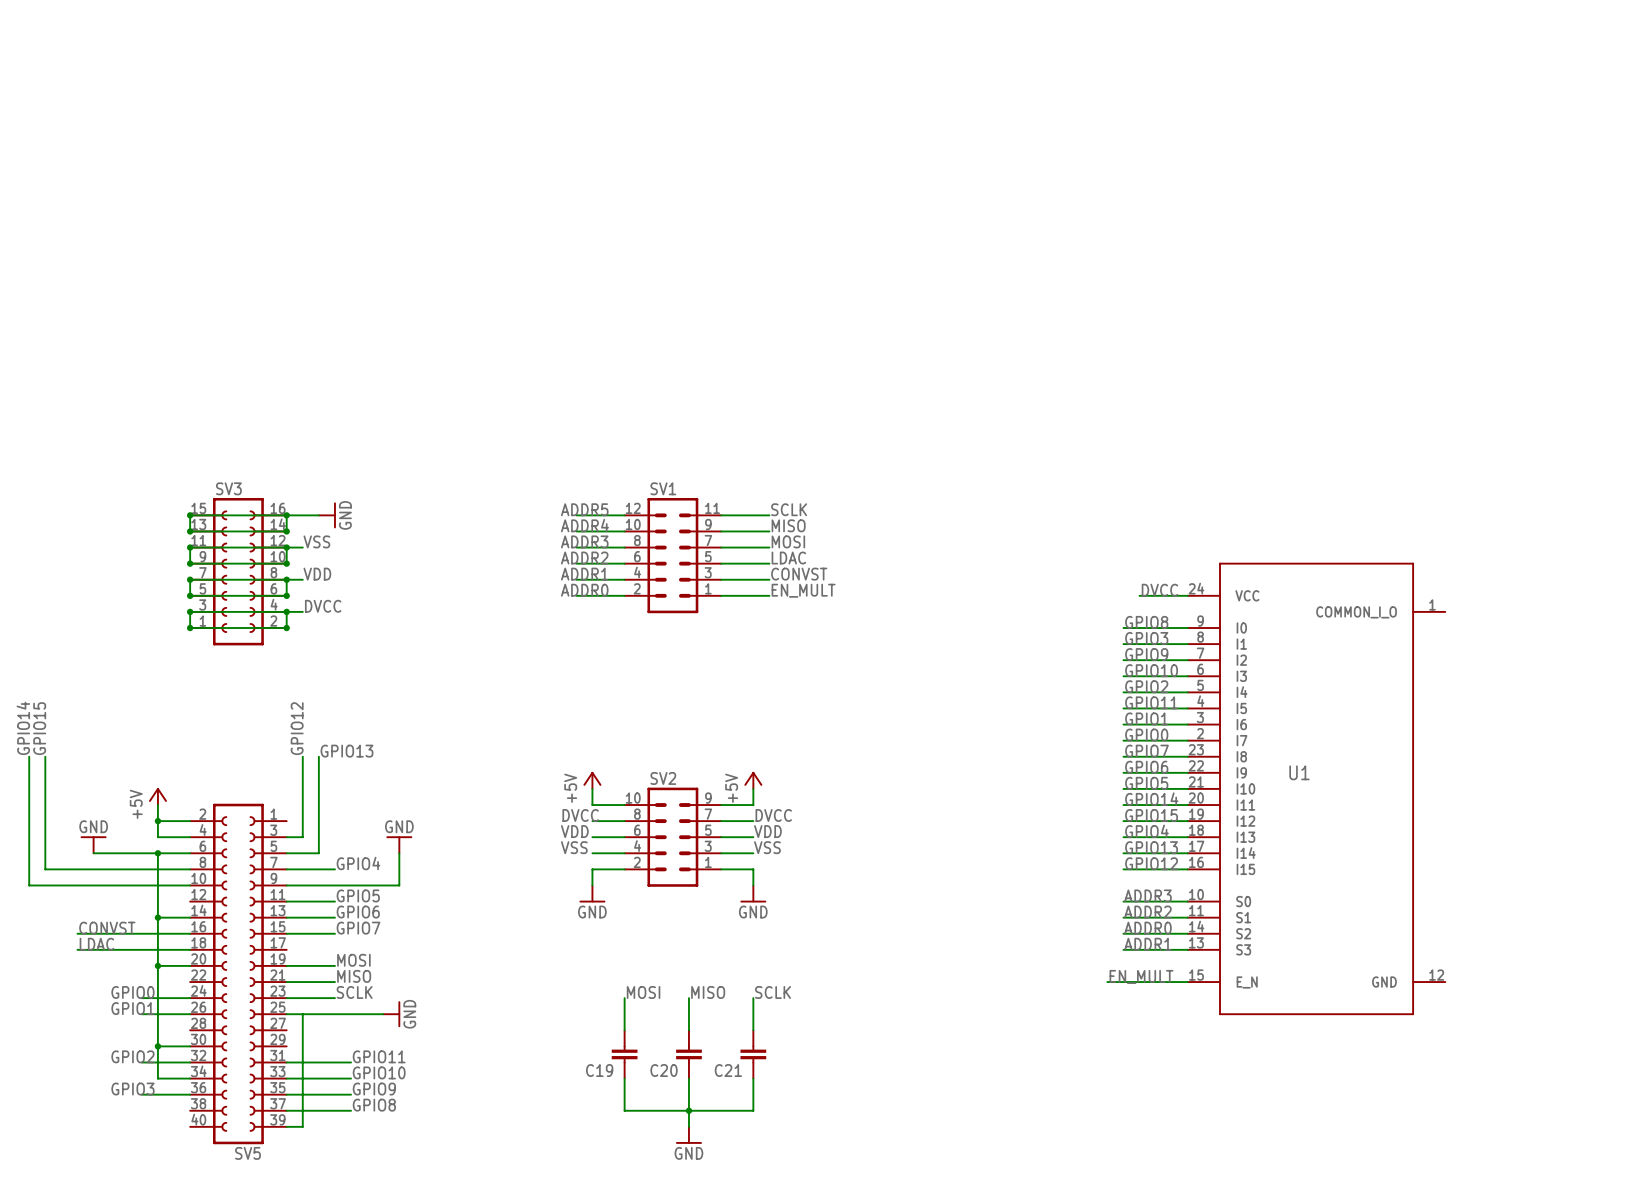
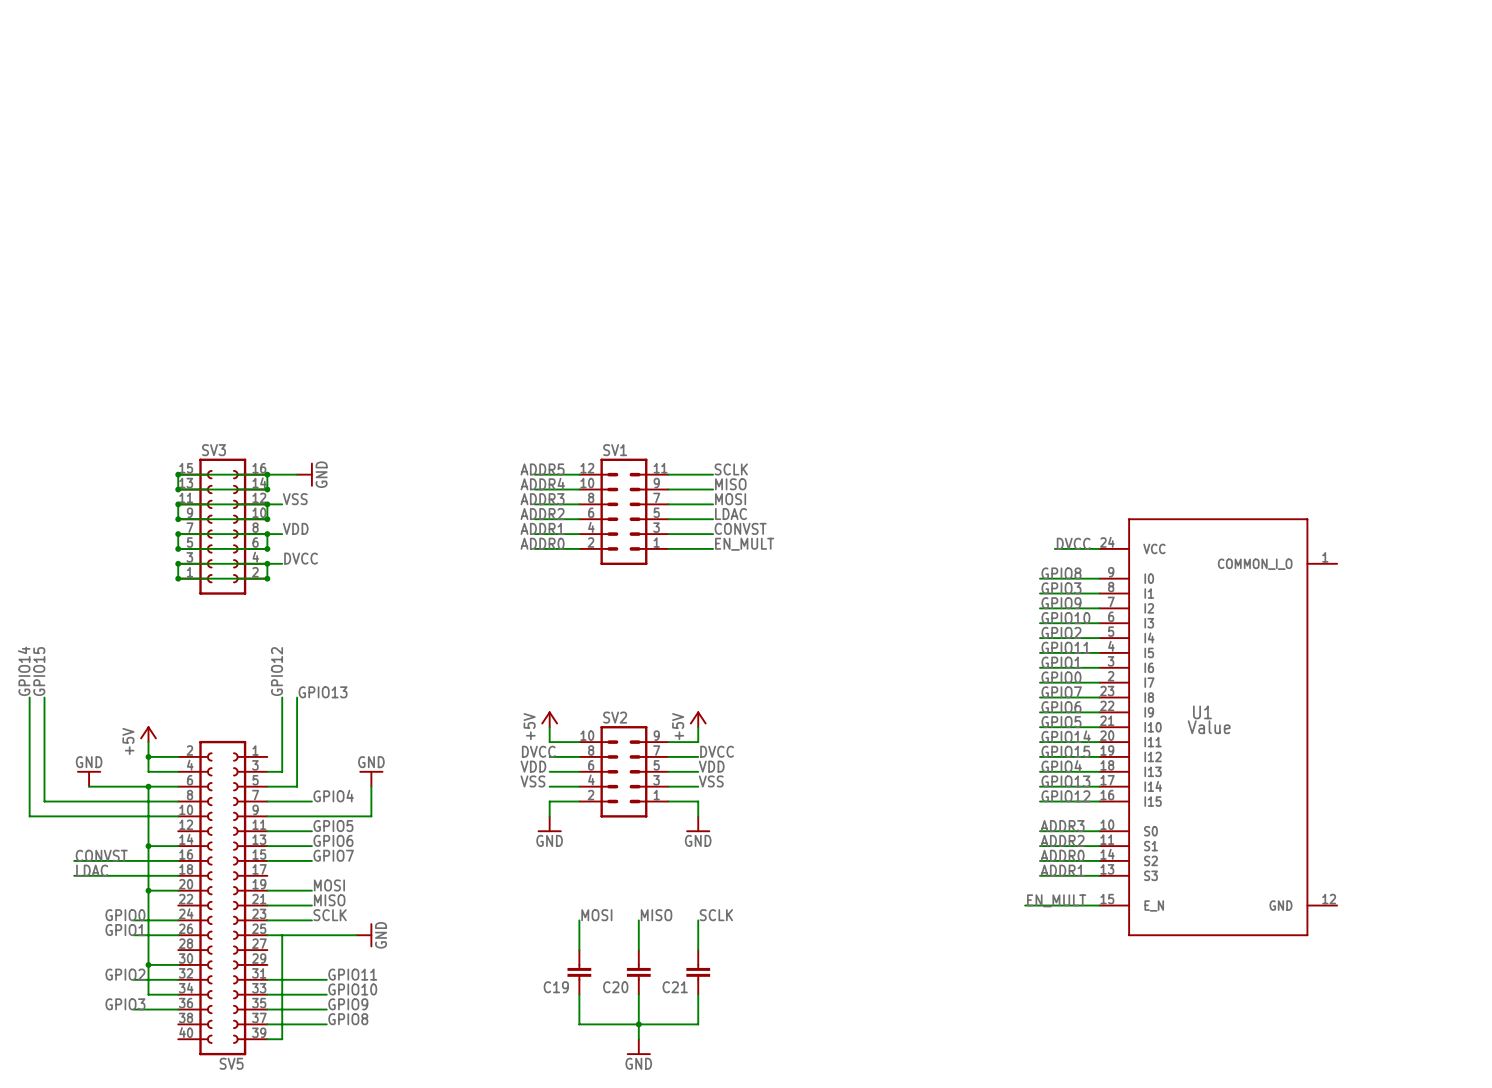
U1 value: none -> Value (1209, 727)

